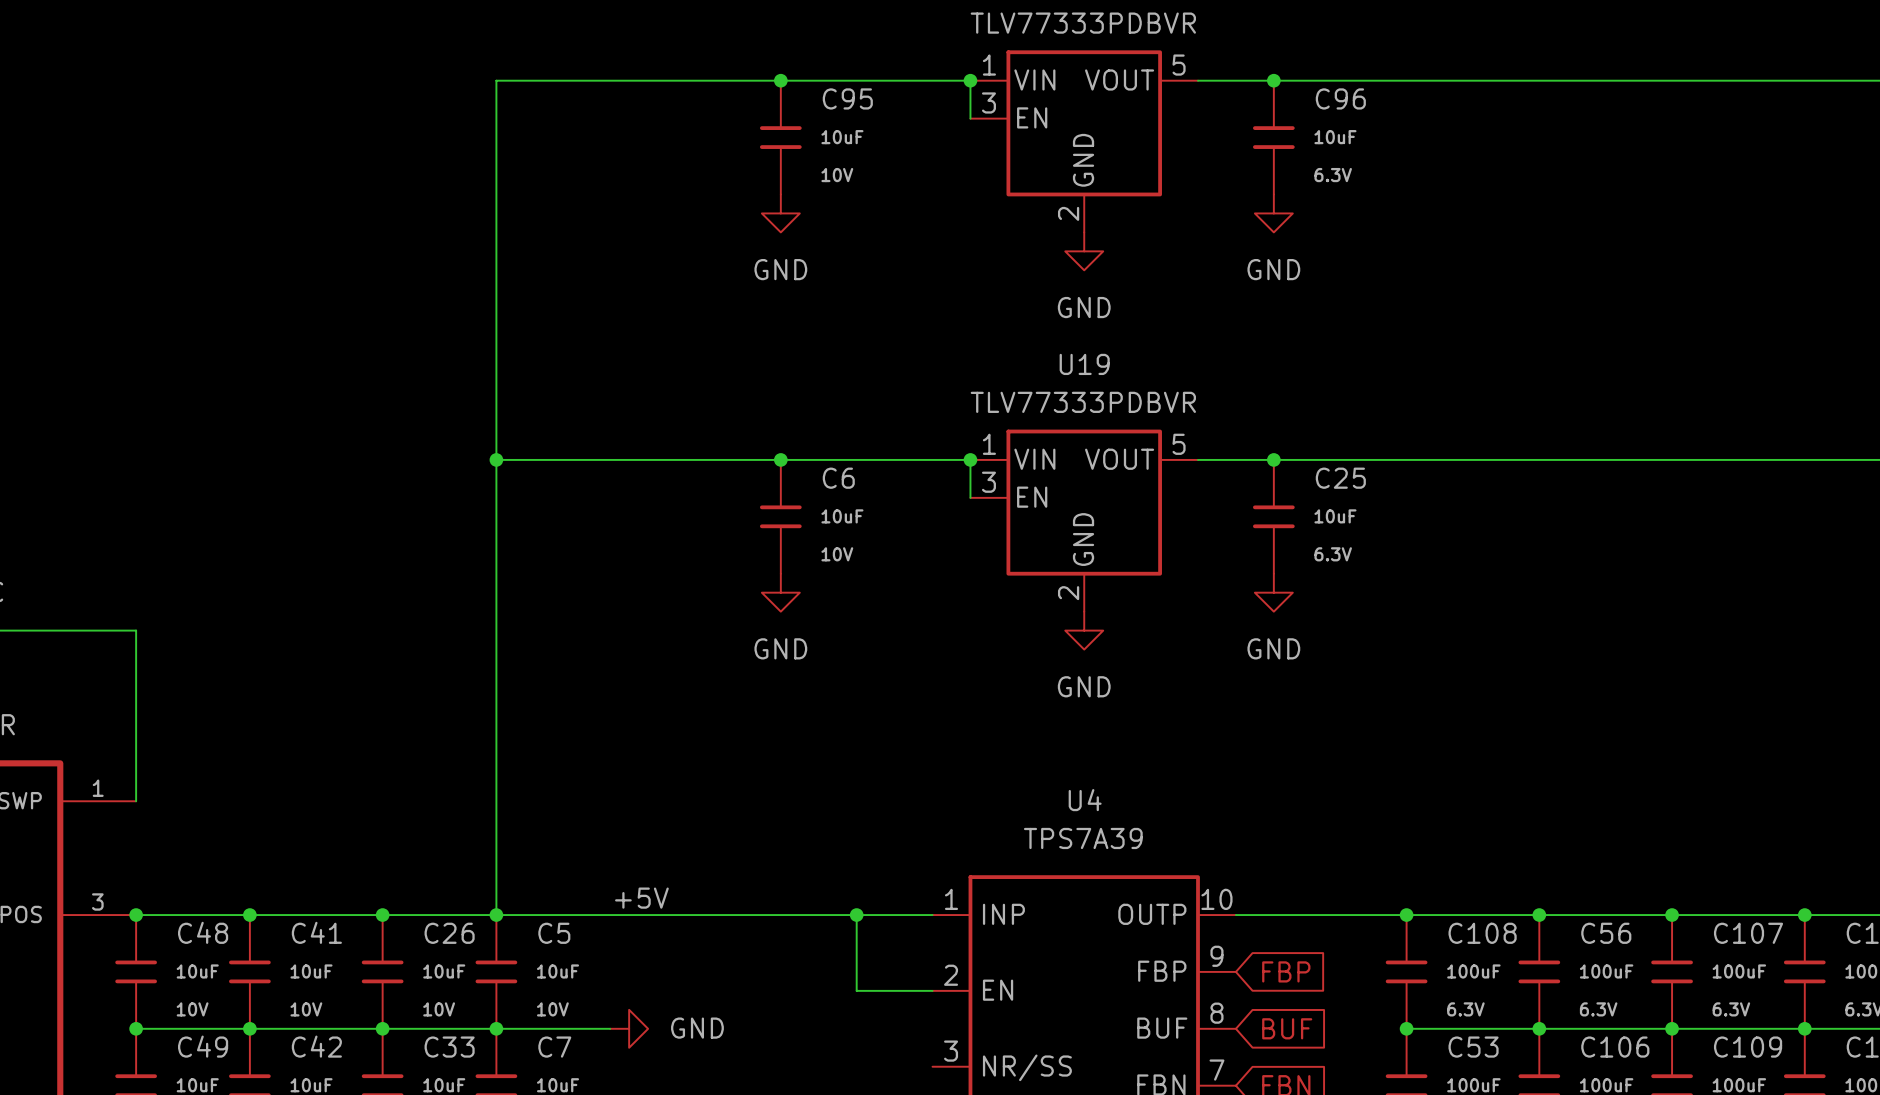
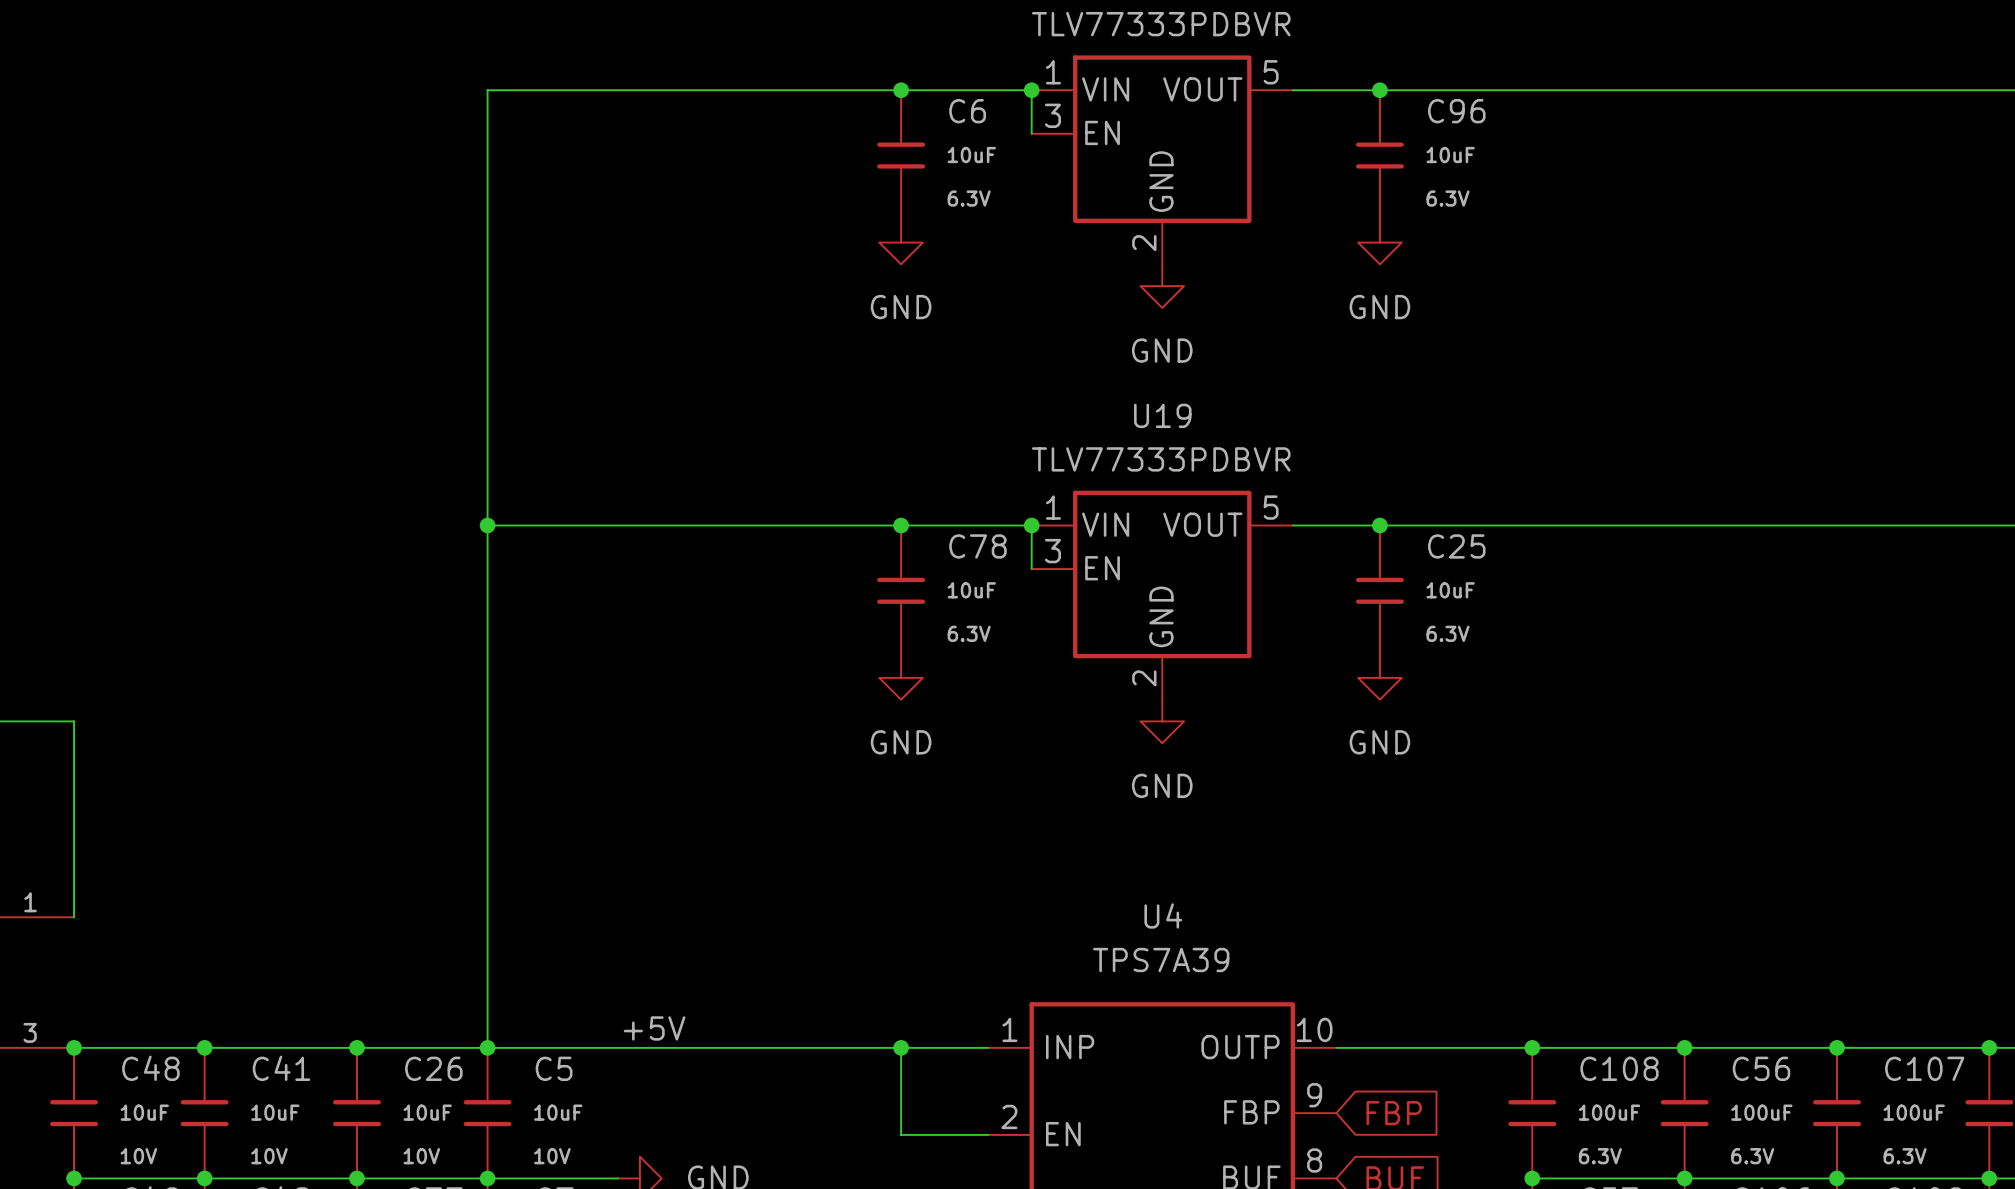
junction position: (780, 80) -> (901, 90)
C95: 10uF (780, 137) -> none
power symbol position: GND (780, 213) -> GND (901, 242)
junction position: (780, 459) -> (901, 525)
C6 position: (780, 516) -> (901, 155)
C78: none -> 10uF (901, 590)
C6 text: 10V (837, 554) -> 6.3V (969, 198)
power symbol position: GND (780, 592) -> GND (901, 677)

